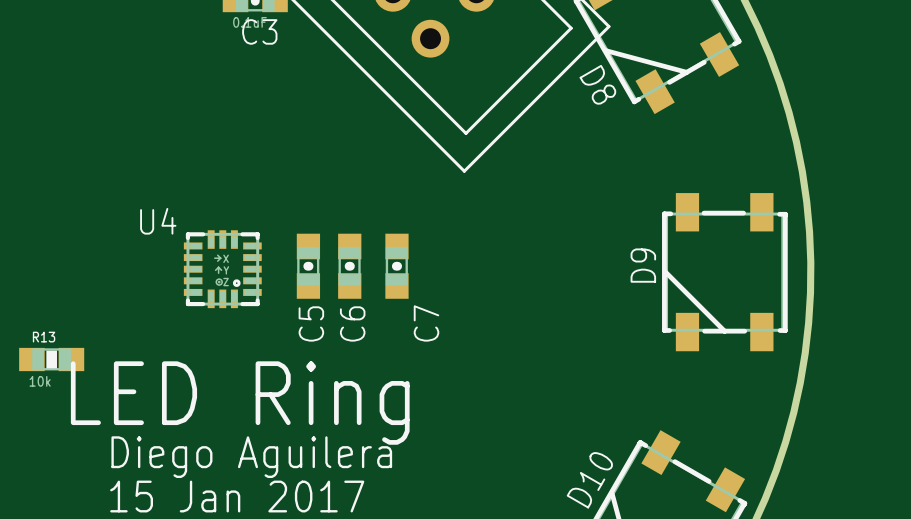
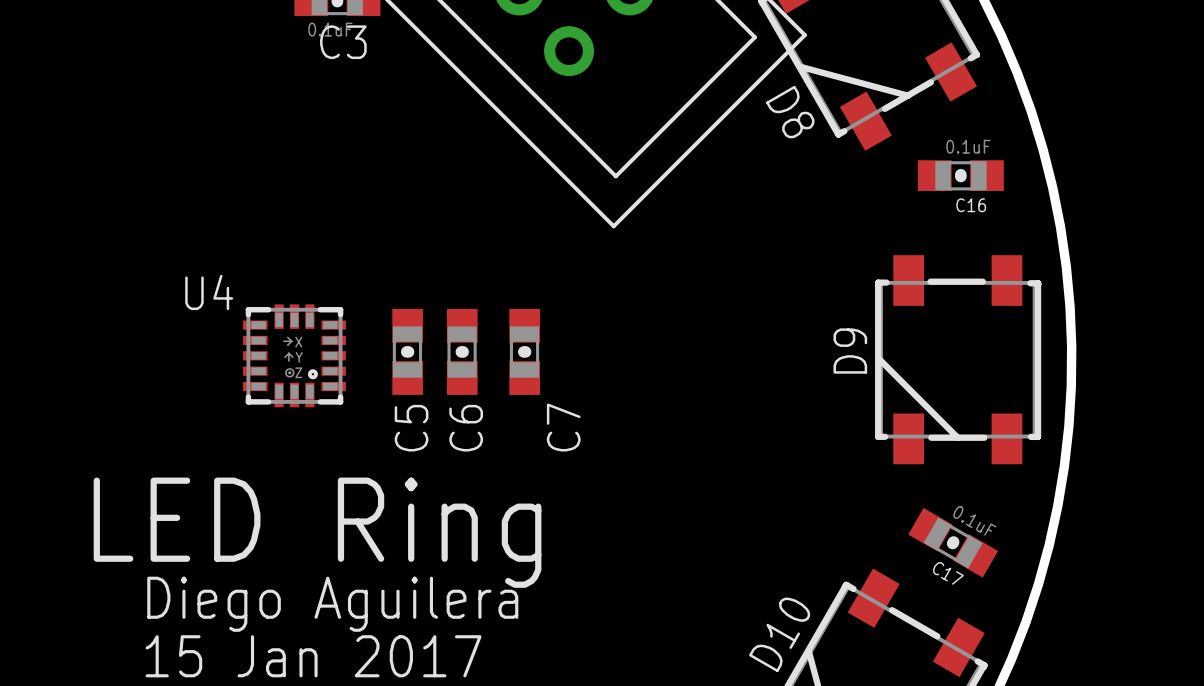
C16: none -> 0.1uF (960, 175)
R13: 10k (51, 359) -> none
C17: none -> 0.1uF (953, 542)

